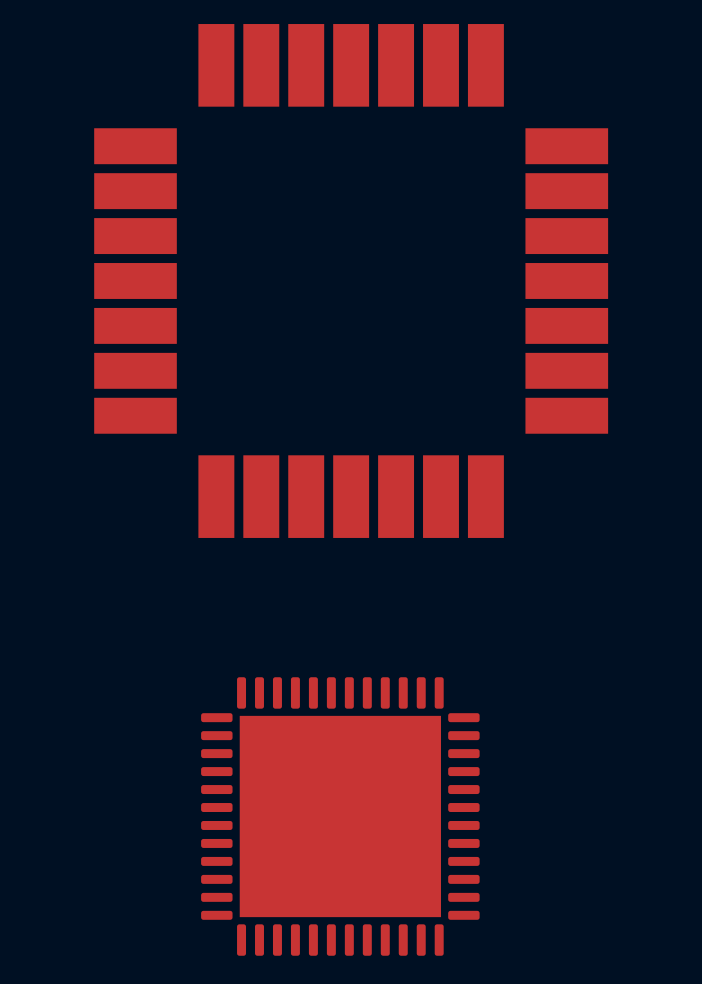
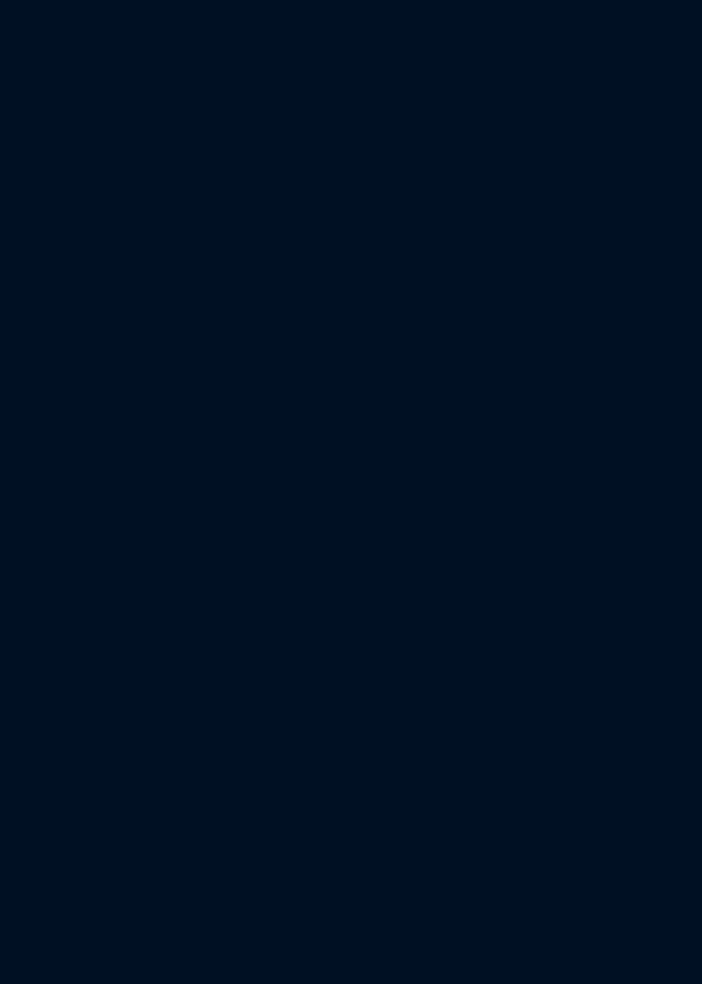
part: (351, 280) -> none
part: (340, 816) -> none

